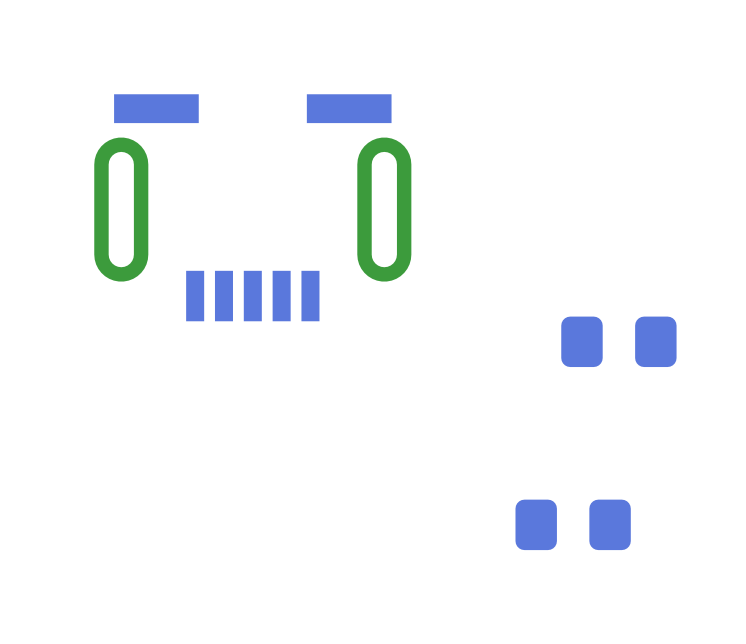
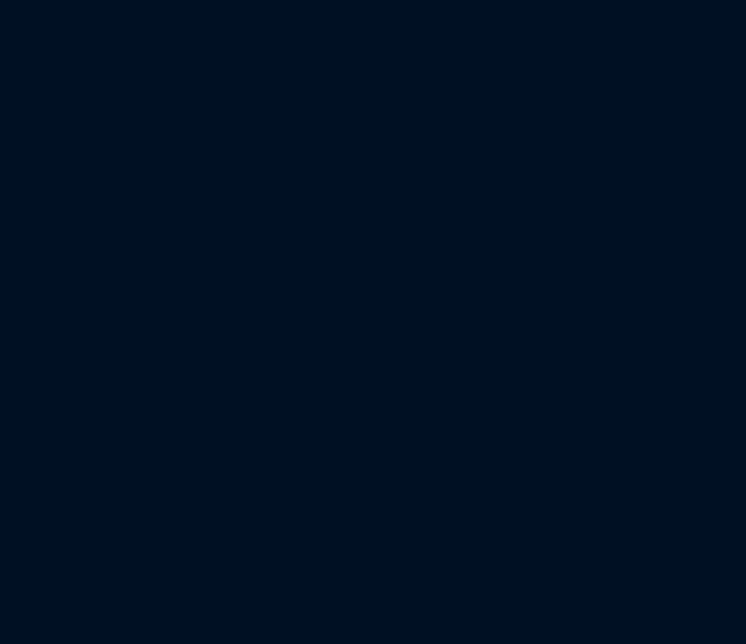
part: (252, 207) -> none
part: (618, 341) -> none
part: (573, 524) -> none

